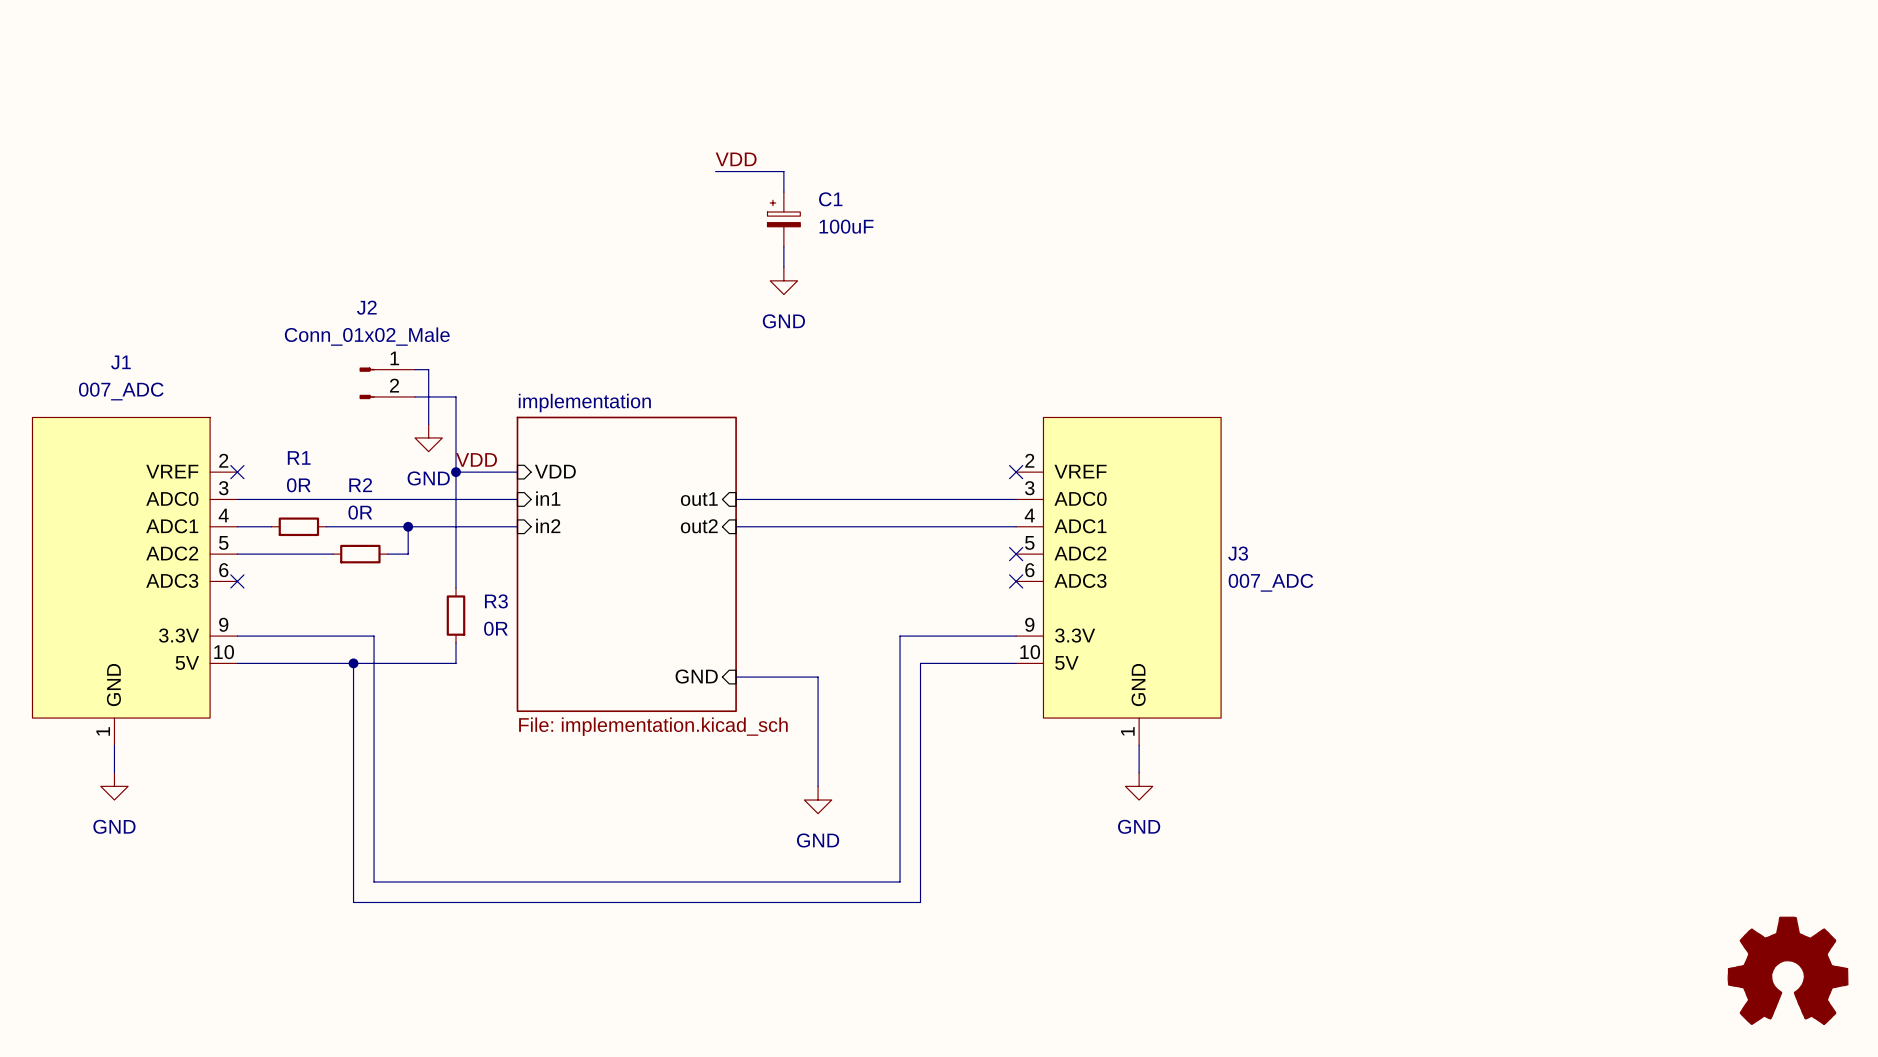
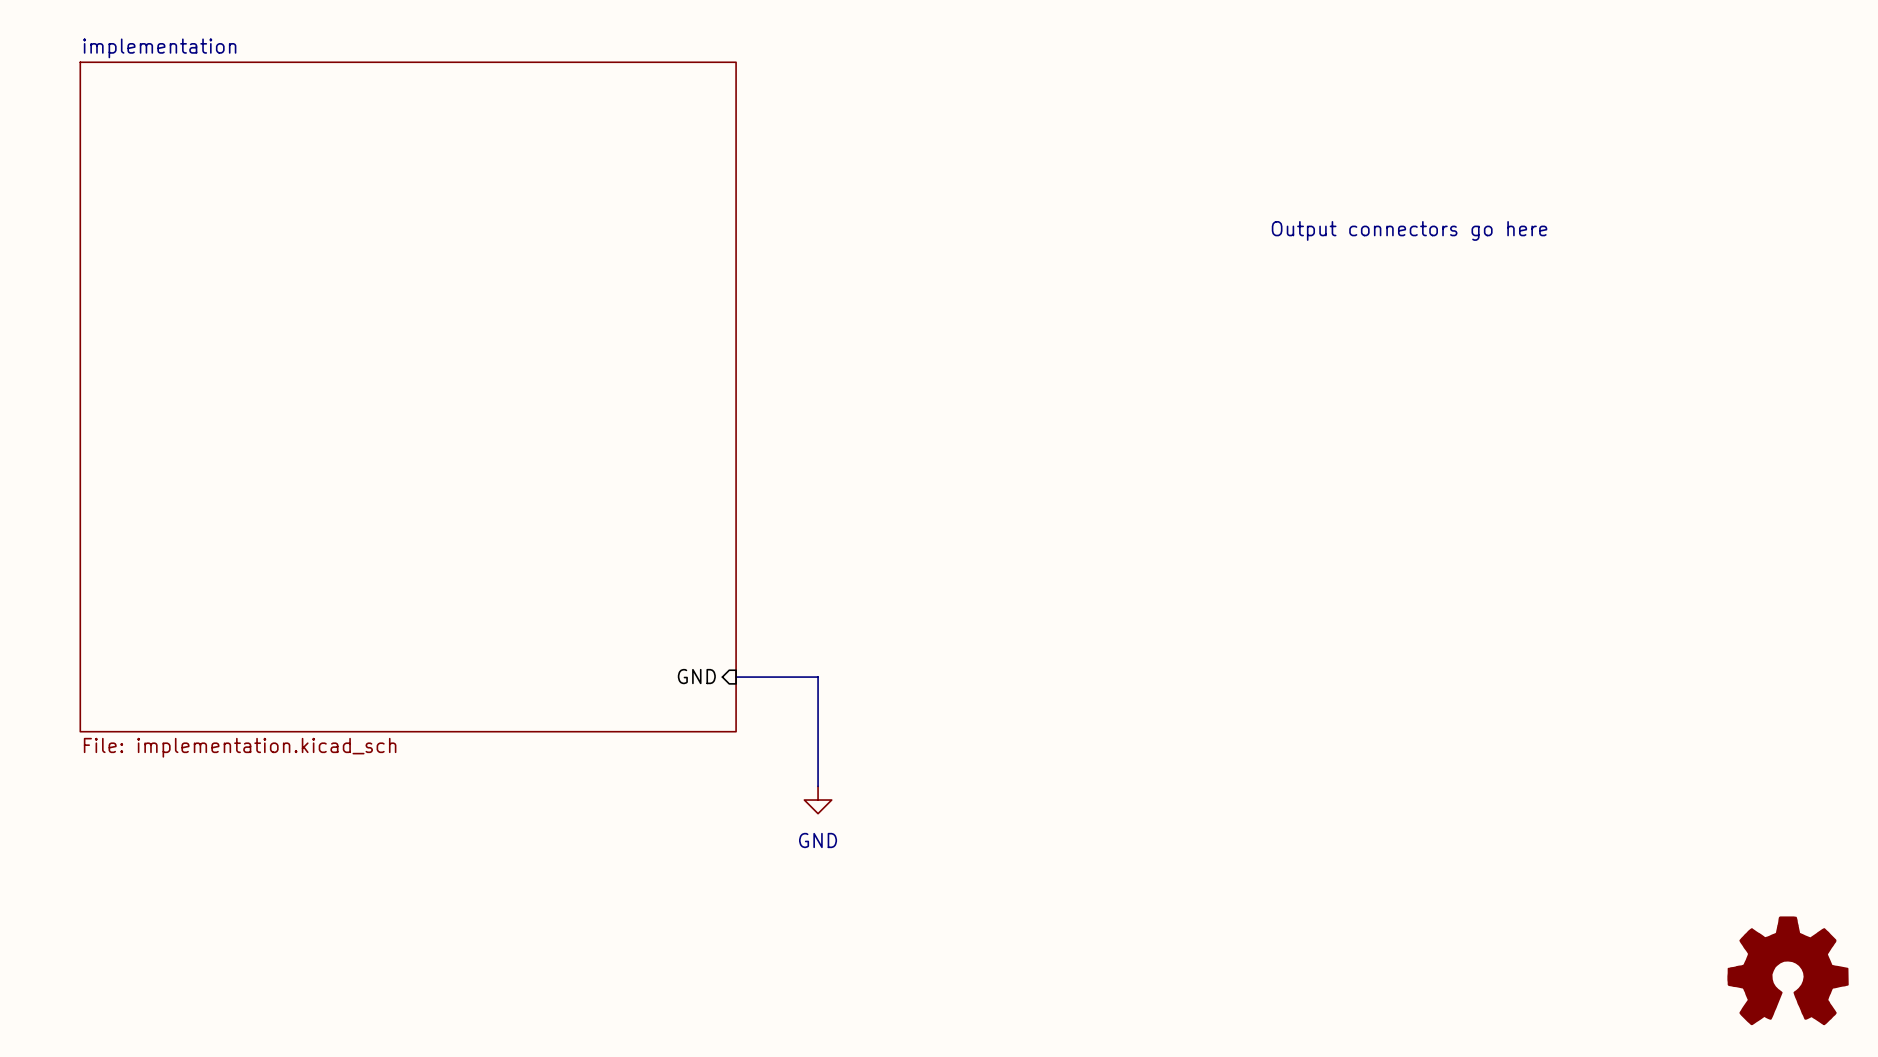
label: VDD (736, 159) -> none
wire: (715, 171) (783, 171) (783, 192) -> none
C1: 100uF (783, 219) -> none
text: none -> Output connectors go here (1409, 230)
wire: (783, 246) (783, 267) -> none
power symbol: GND (783, 280) -> none
wire: (415, 369) (428, 369) (428, 424) -> none
J2: Conn_01x02_Male (387, 383) -> none
sheet implementation: none -> File: implementation.kicad_sch (408, 396)
wire: (415, 396) (456, 396) (456, 588) -> none
power symbol: GND (428, 437) -> none
label: VDD (476, 459) -> none
sheet pin: VDD (555, 471) -> none
no-connect mark: (237, 472) -> none
wire: (456, 472) (517, 472) -> none
junction: (456, 472) -> none
no-connect mark: (1016, 472) -> none
sheet pin: in1 (548, 498) -> none
wire: (237, 499) (517, 499) -> none
sheet pin: out1 (699, 499) -> none
wire: (736, 499) (1016, 499) -> none
sheet pin: in2 (548, 525) -> none
wire: (237, 526) (271, 526) -> none
R1: 0R (298, 526) -> none
wire: (326, 526) (517, 526) -> none
wire: (408, 526) (408, 554) (387, 554) -> none
junction: (408, 526) -> none
sheet pin: out2 (699, 526) -> none
wire: (736, 526) (1016, 526) -> none
wire: (237, 554) (333, 554) -> none
R2: 0R (360, 554) -> none
no-connect mark: (1016, 554) -> none
sheet implementation: File: implementation.kicad_sch (626, 564) -> none
J1: 007_ADC (134, 581) -> none
no-connect mark: (237, 581) -> none
no-connect mark: (1016, 581) -> none
J3: 007_ADC (1118, 581) -> none
R3: 0R (456, 615) -> none
wire: (237, 636) (374, 636) (374, 881) (900, 881) (900, 636) (1016, 636) -> none
wire: (456, 642) (456, 663) (237, 663) -> none
wire: (353, 663) (353, 902) (920, 902) (920, 663) (1016, 663) -> none
junction: (353, 663) -> none
wire: (114, 745) (114, 772) -> none
wire: (1139, 745) (1139, 772) -> none
power symbol: GND (114, 786) -> none
power symbol: GND (1139, 786) -> none

